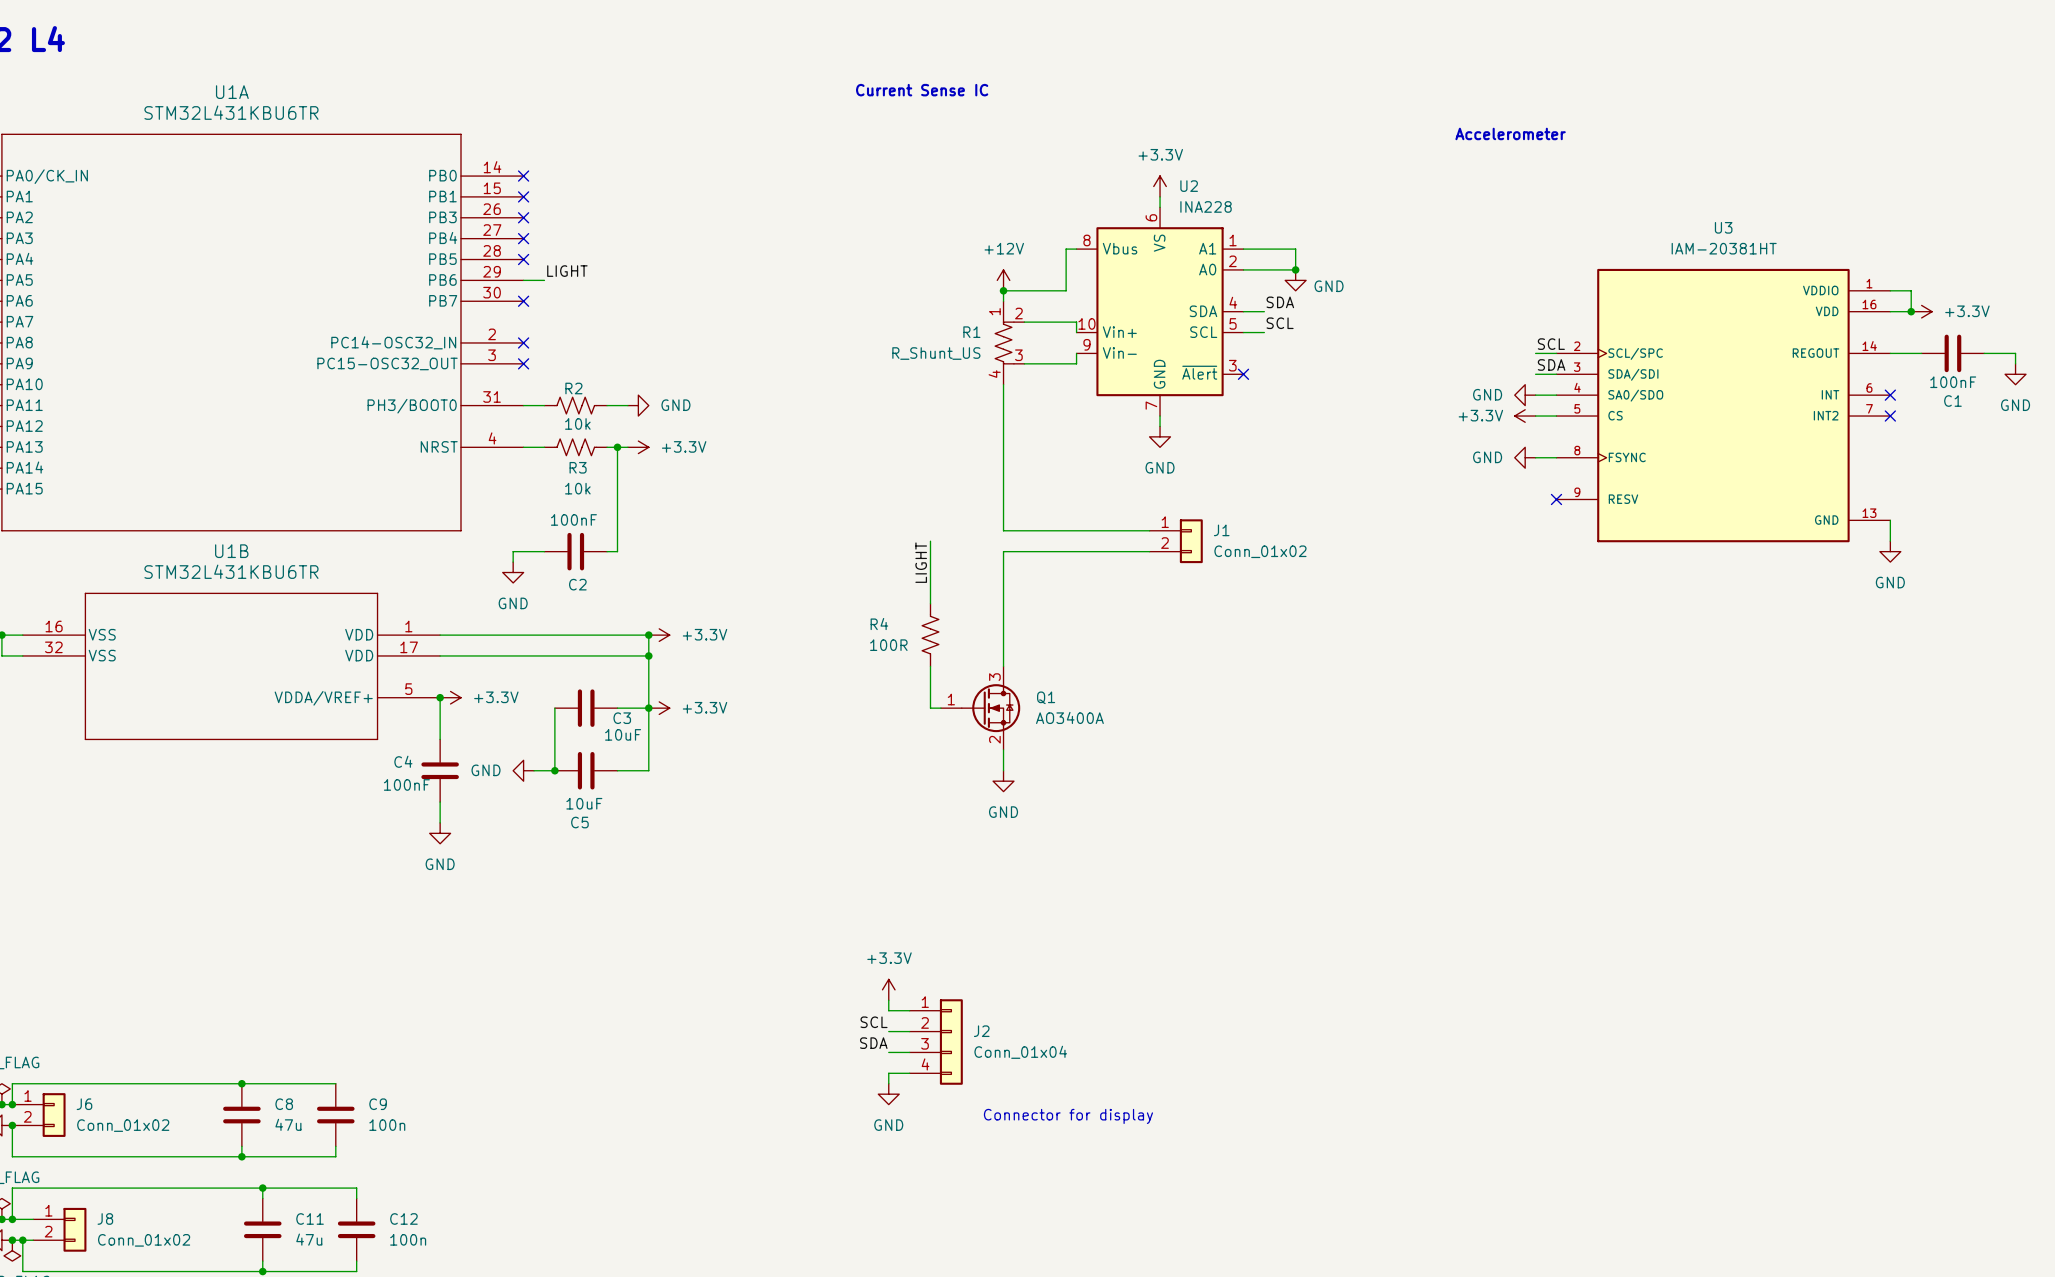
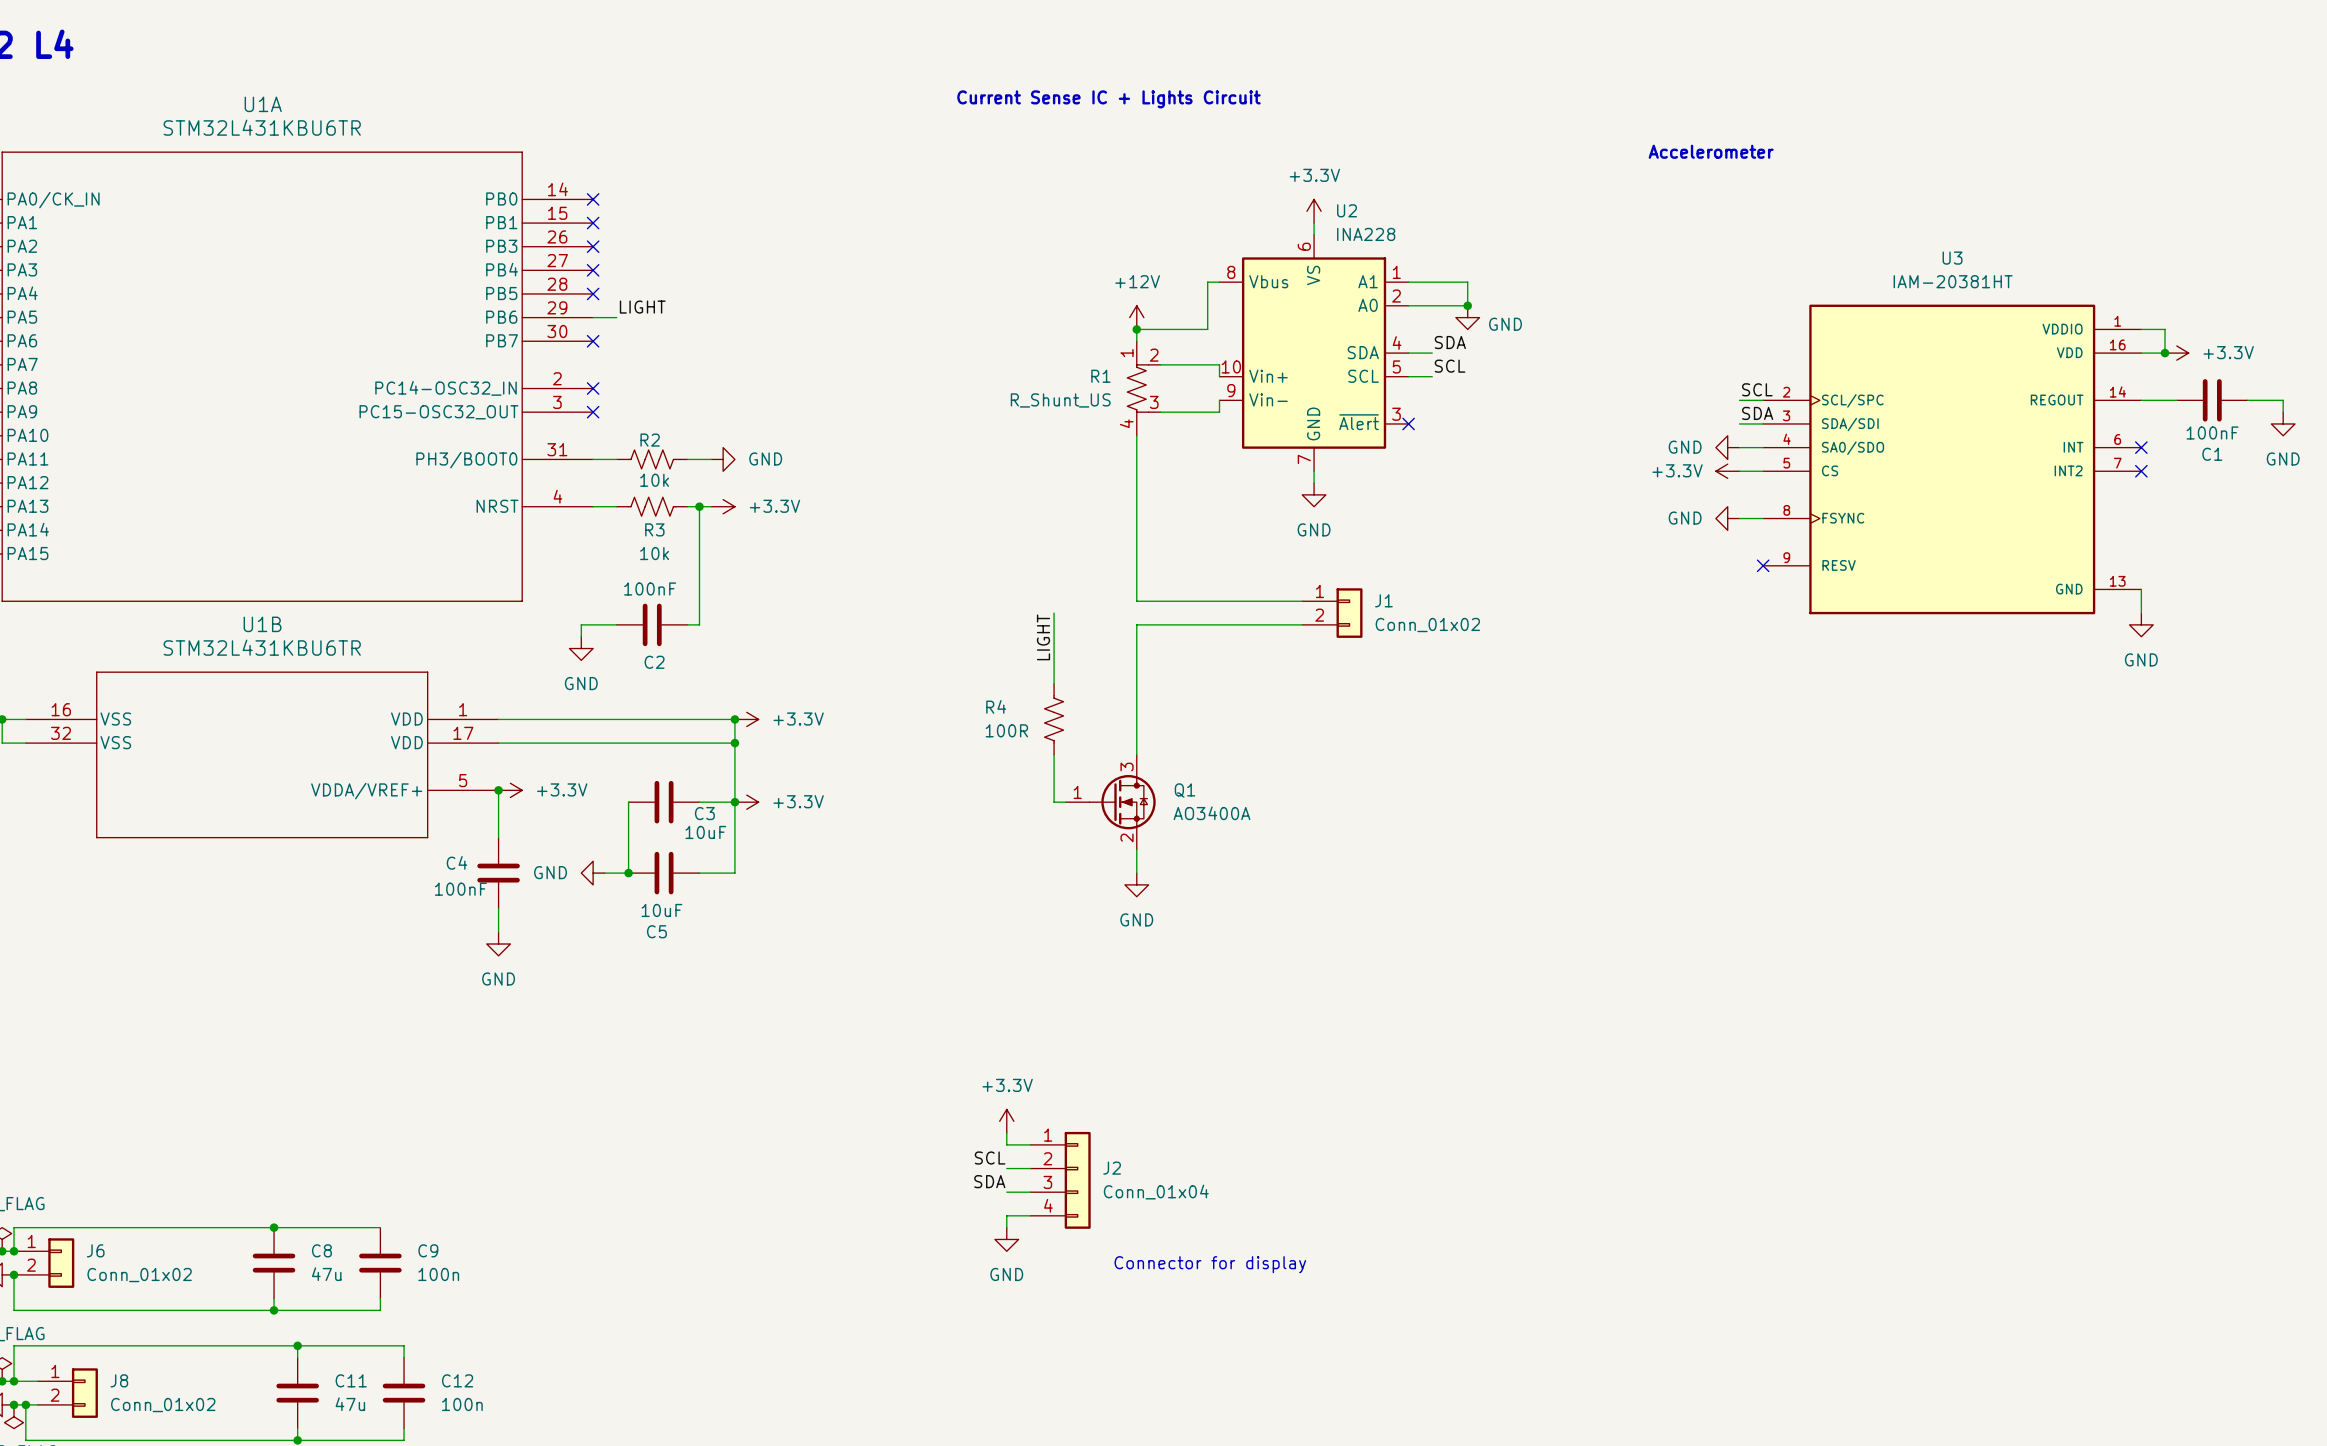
text: Current Sense IC (922, 90) -> Current Sense IC + Lights Circuit (1108, 99)

